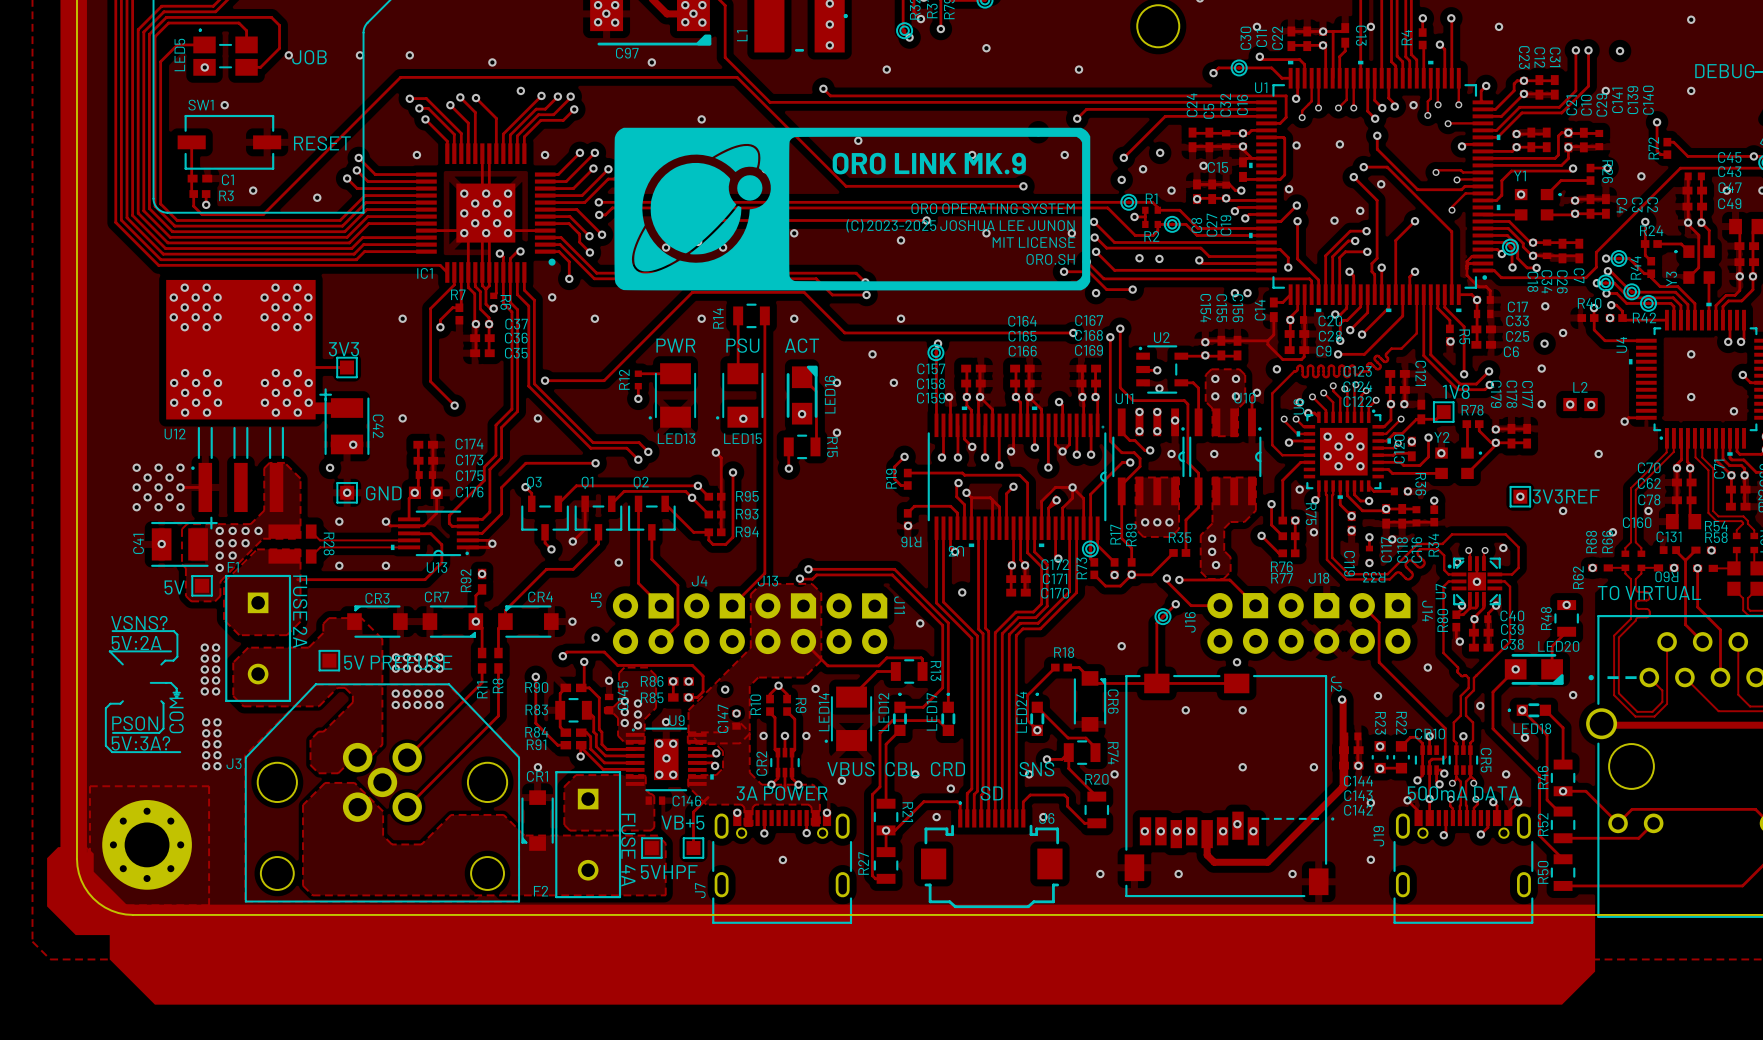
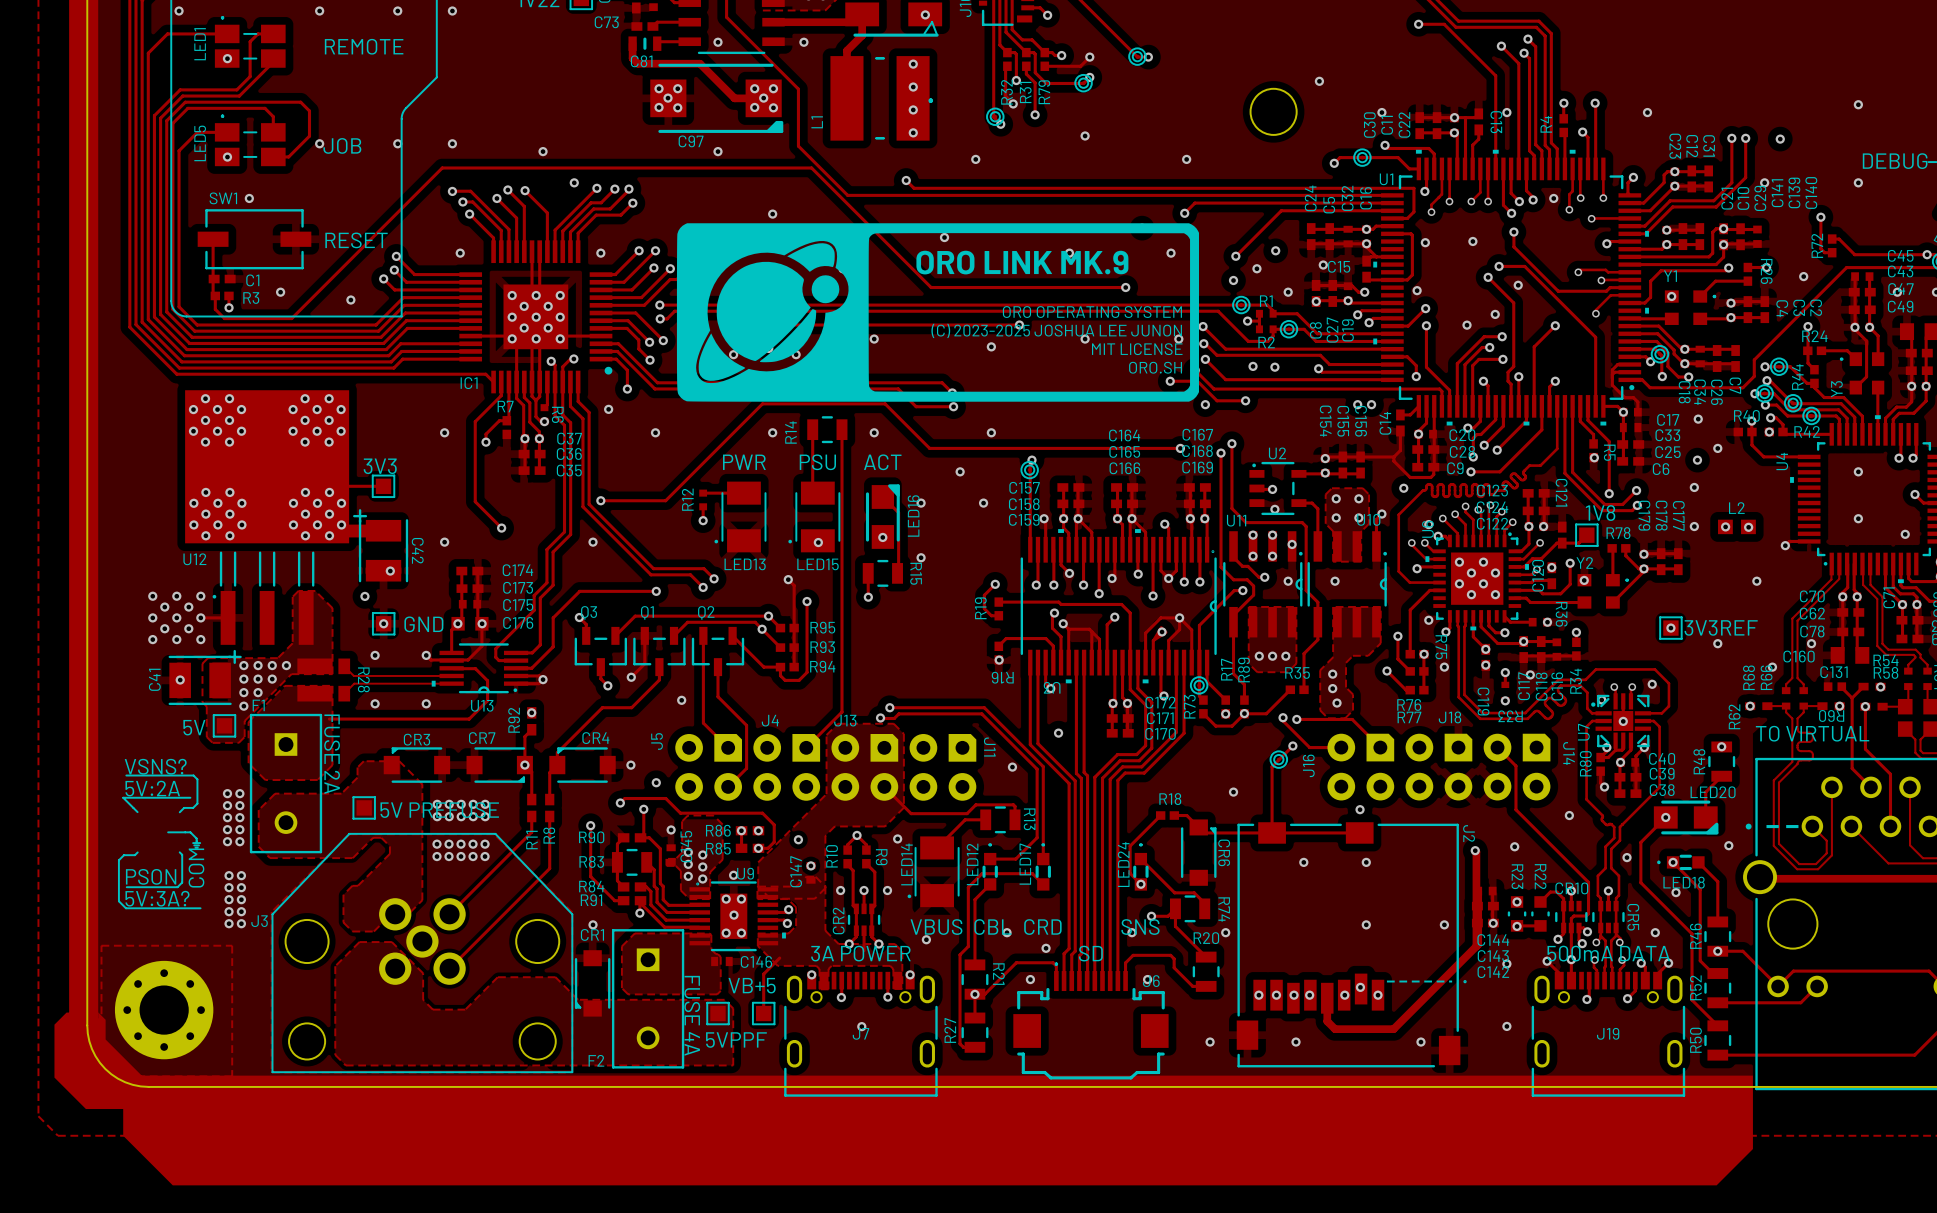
J19 name rotation: 0° (1378, 836) -> 90° clockwise (1608, 1033)
J19 name position: J19 (1378, 836) -> J19 (1608, 1033)
text: 5VHPF (669, 872) -> 5VPPF (736, 1040)
J7 name rotation: 0° (700, 890) -> 90° clockwise (860, 1033)
J7 name position: J7 (700, 890) -> J7 (860, 1033)

